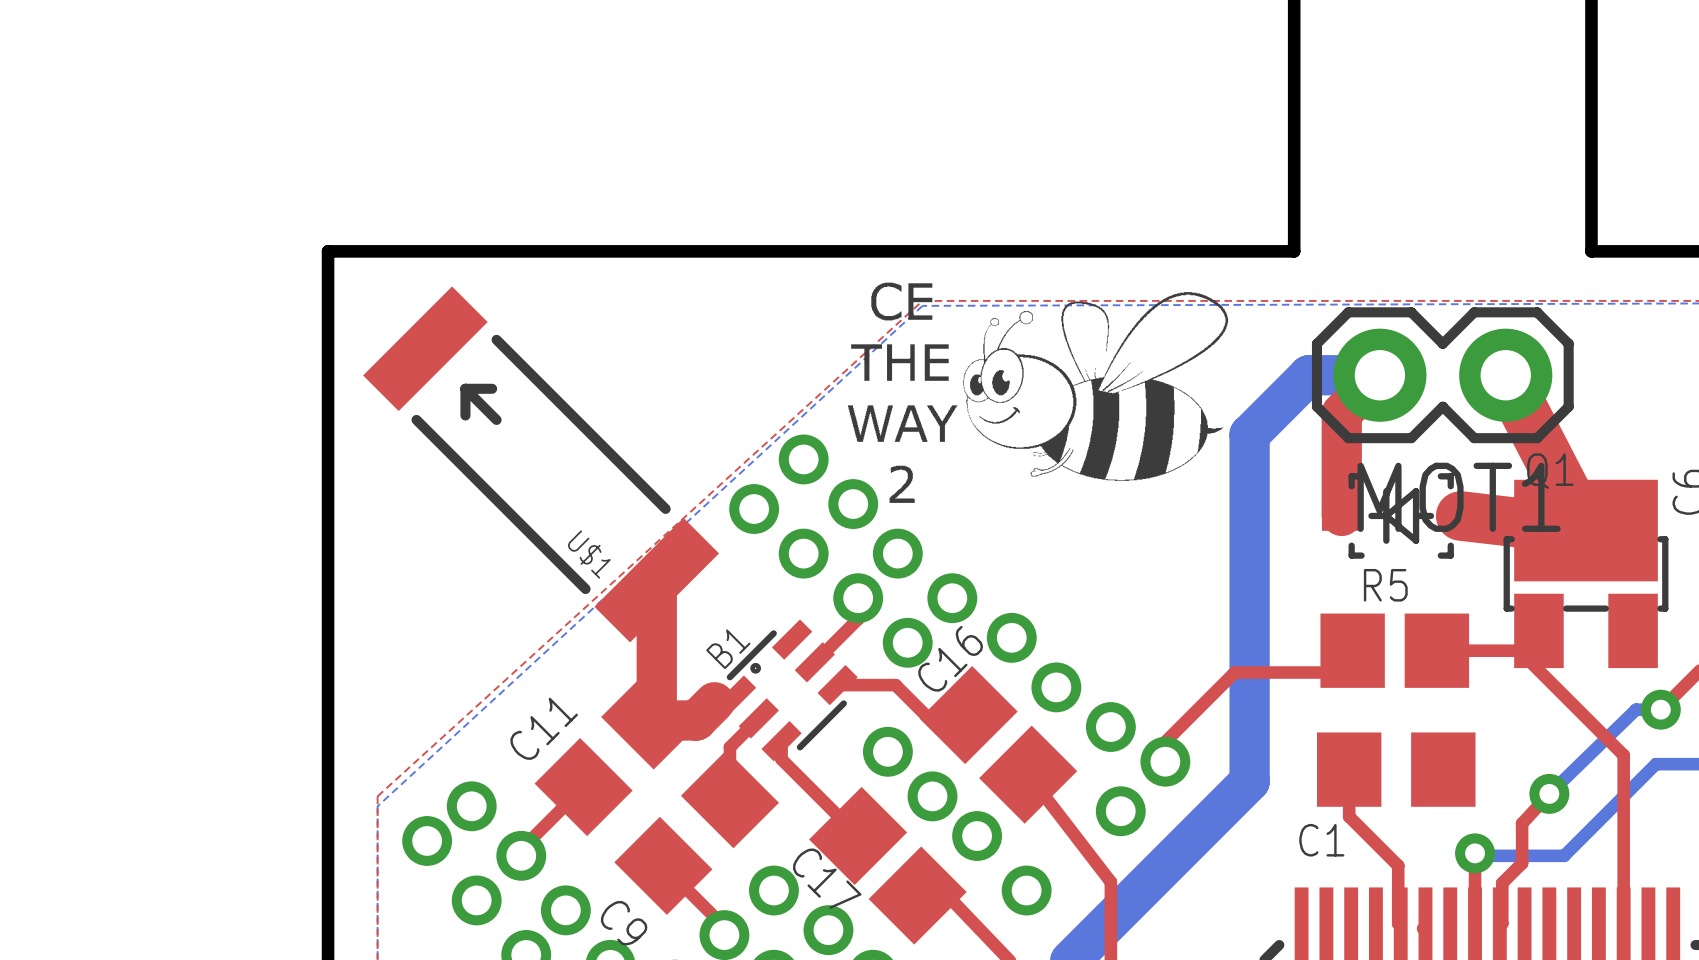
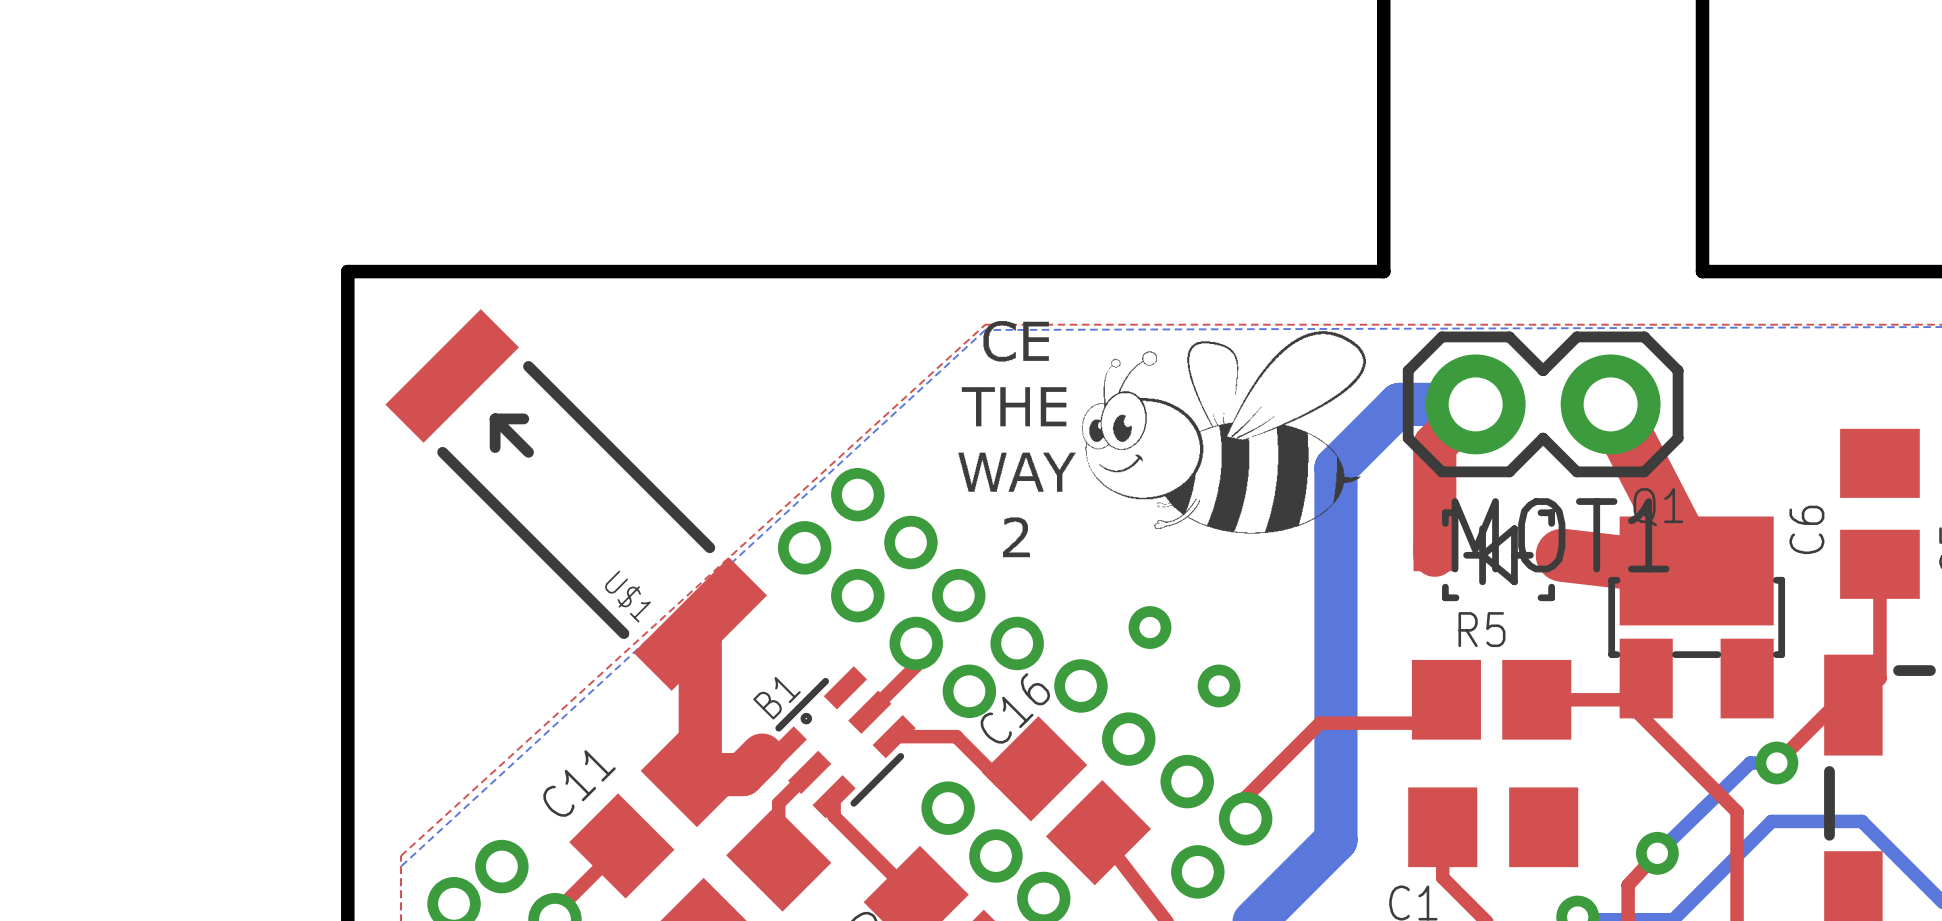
drawing position: (1038, 392) -> (1162, 439)
via: none -> (1150, 627)
via: none -> (1219, 685)

